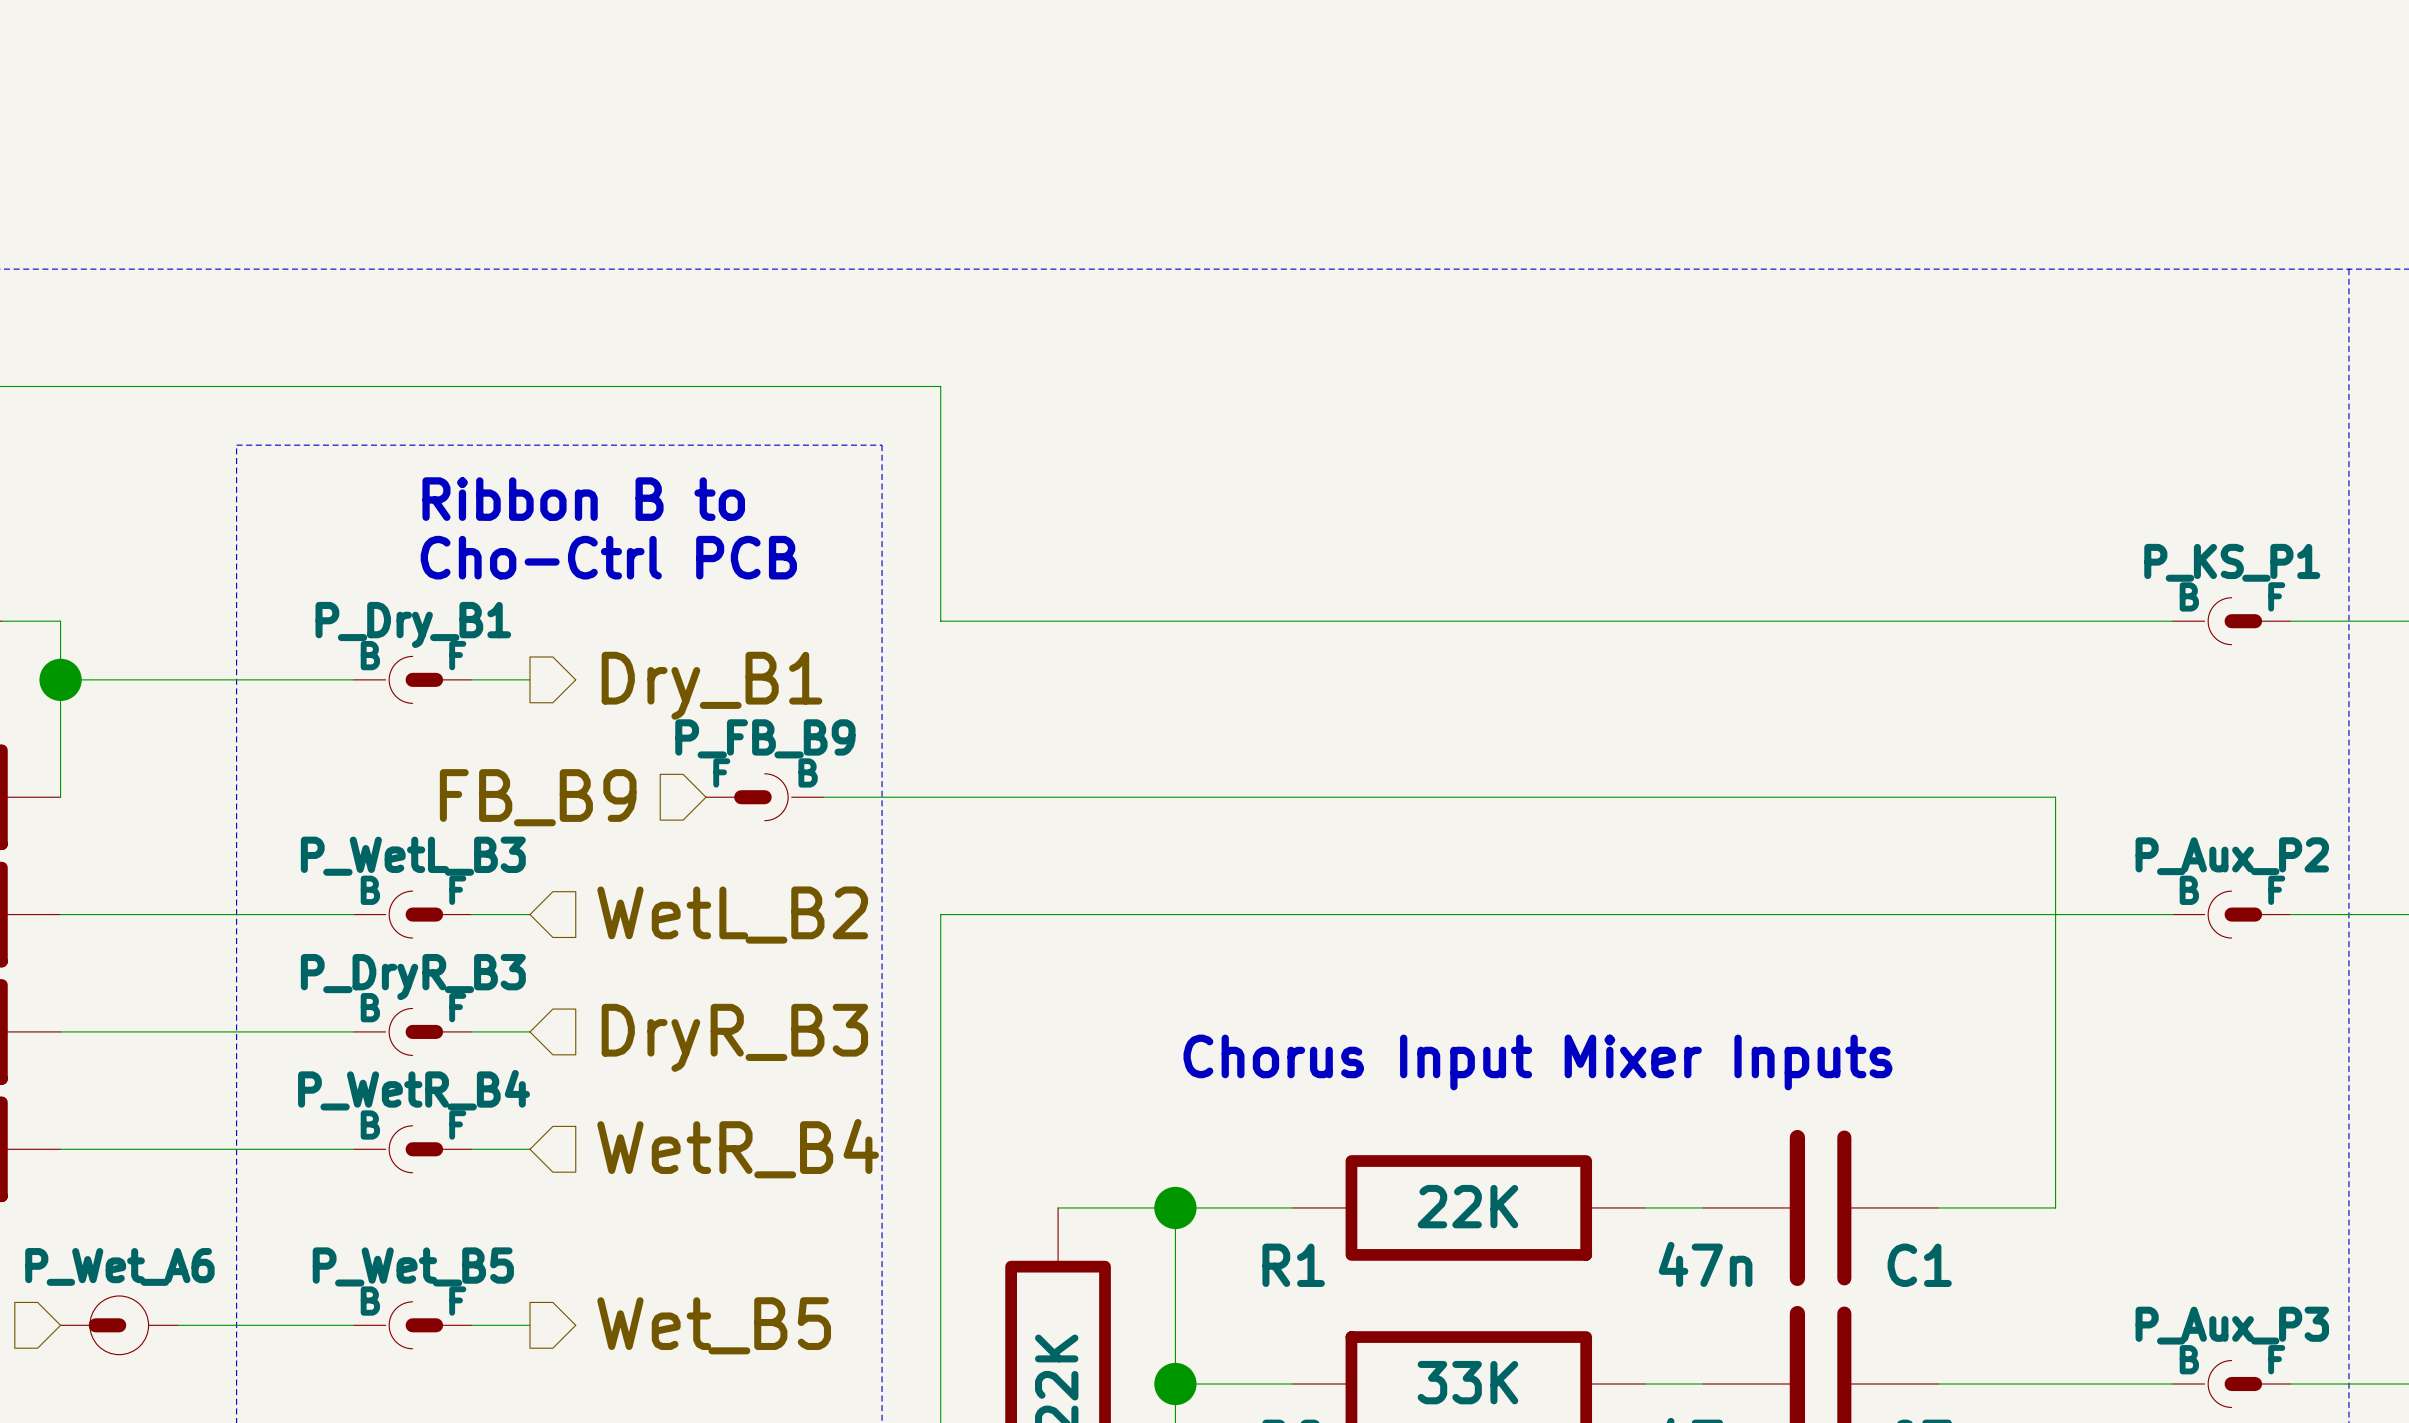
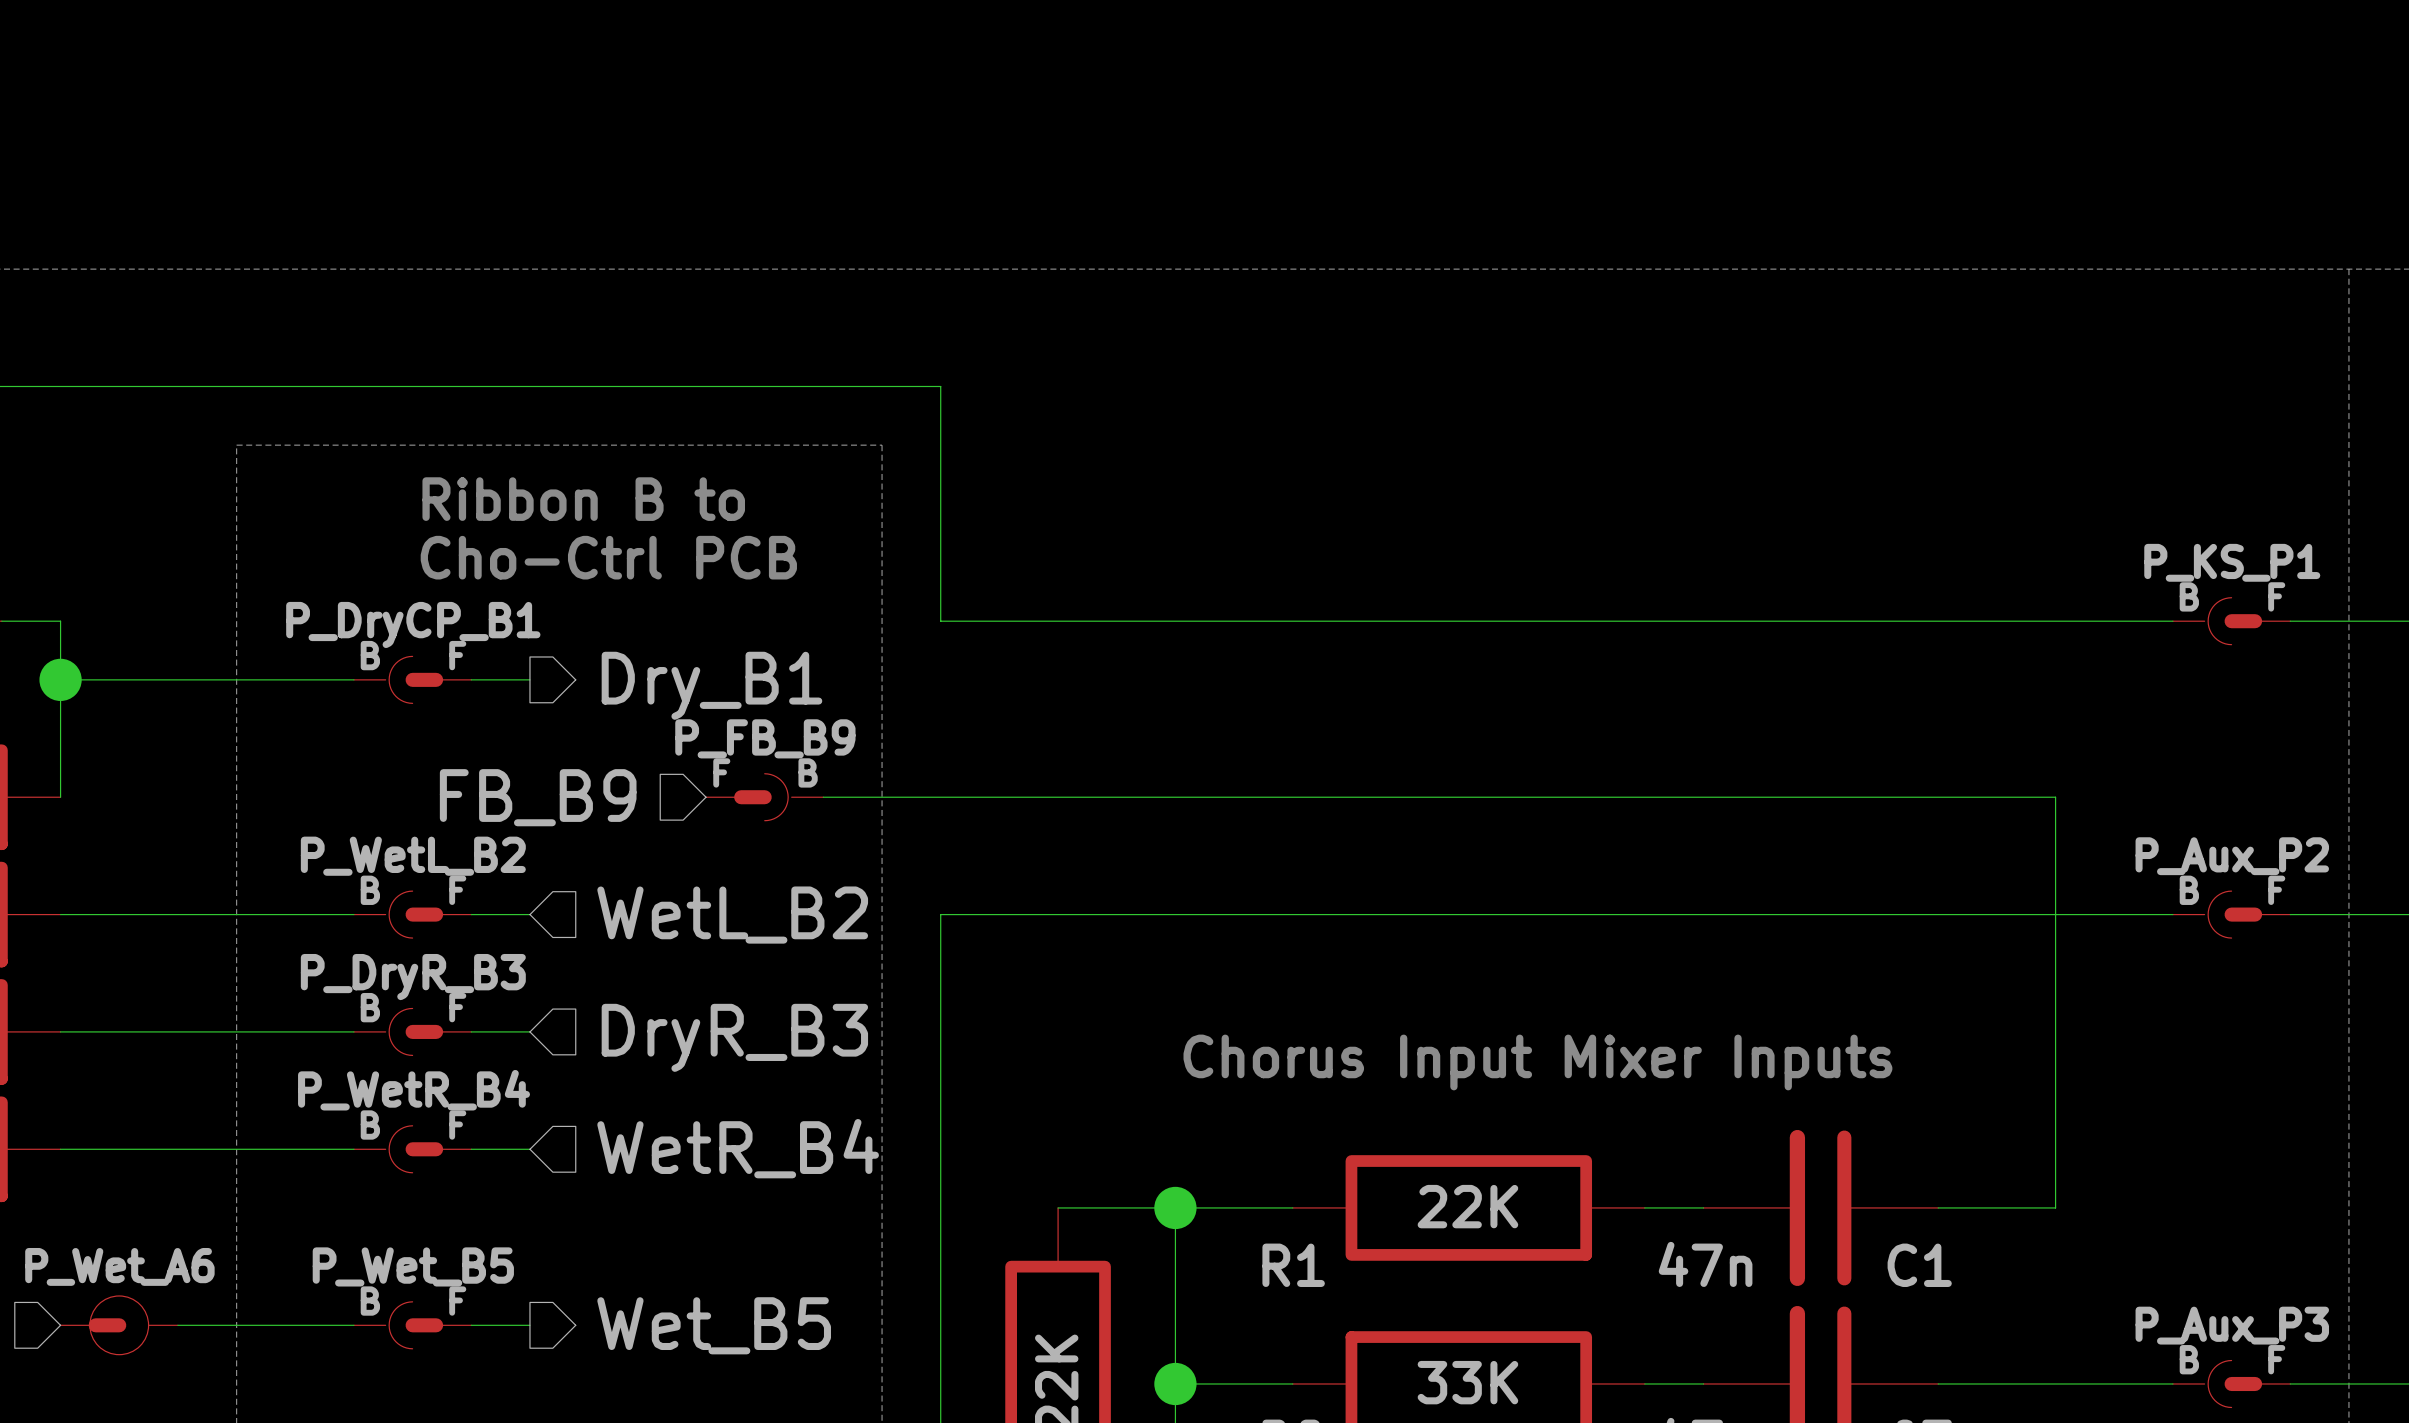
P_Dry_B1 name: P_Dry_B1 (413, 624) -> P_DryCP_B1 (413, 624)
P_WetL_B3 name: P_WetL_B3 (413, 856) -> P_WetL_B2 (413, 856)

